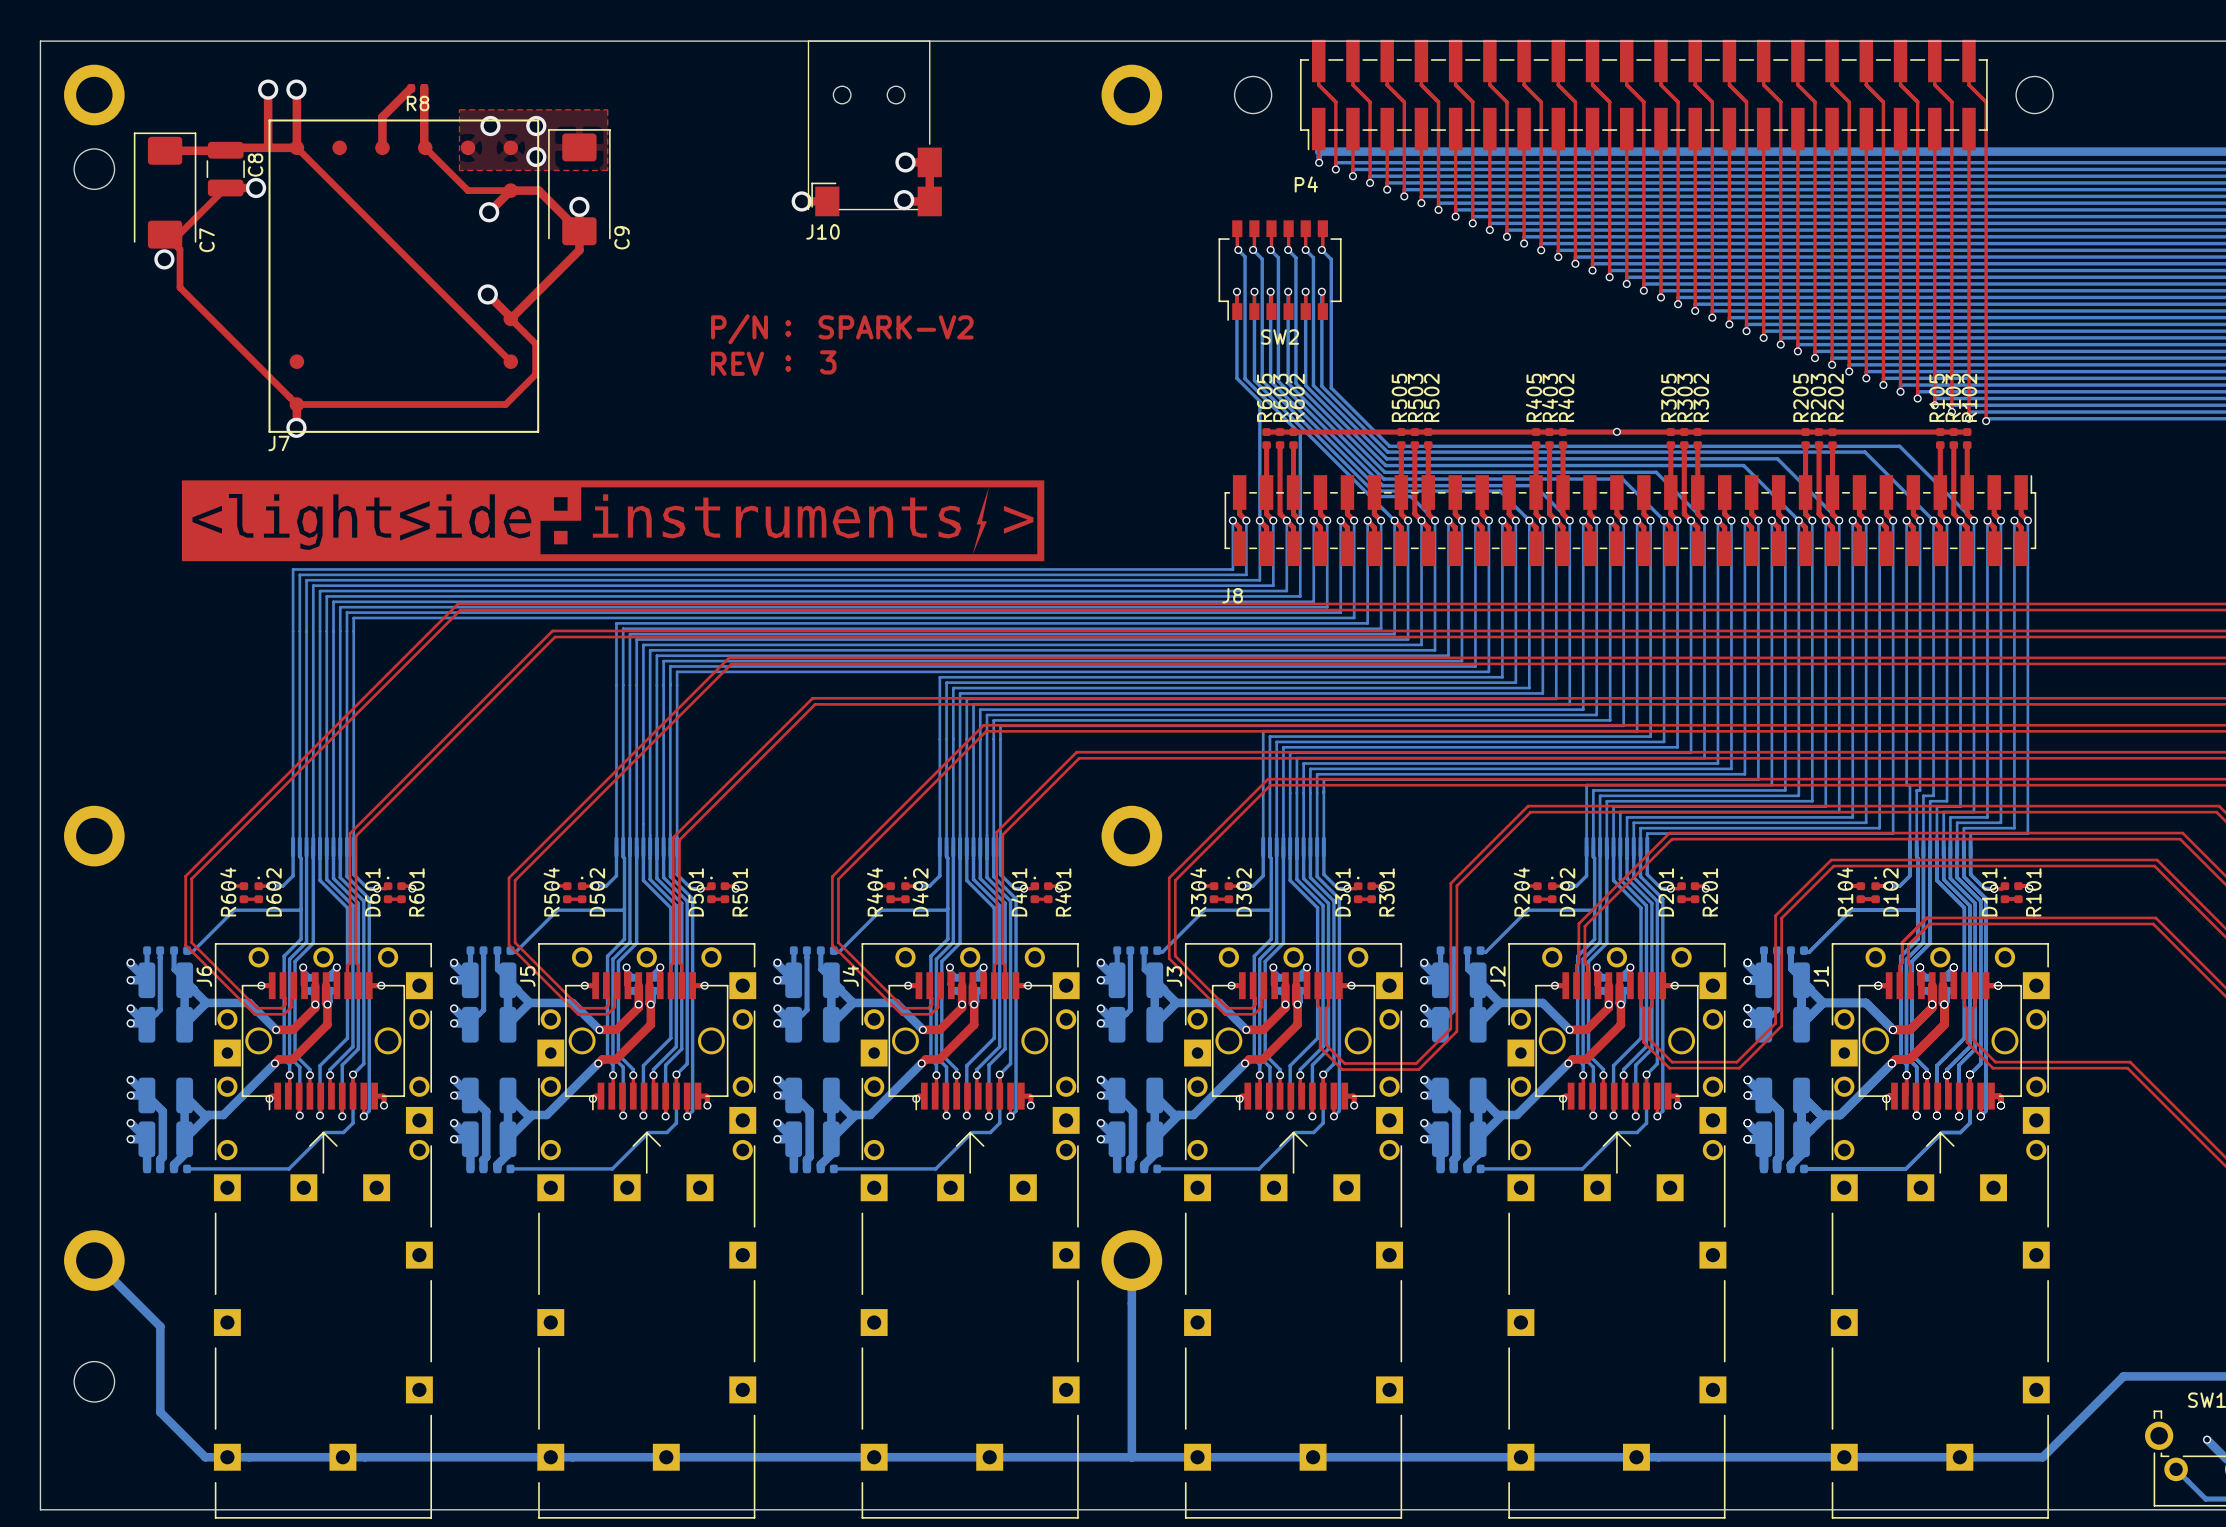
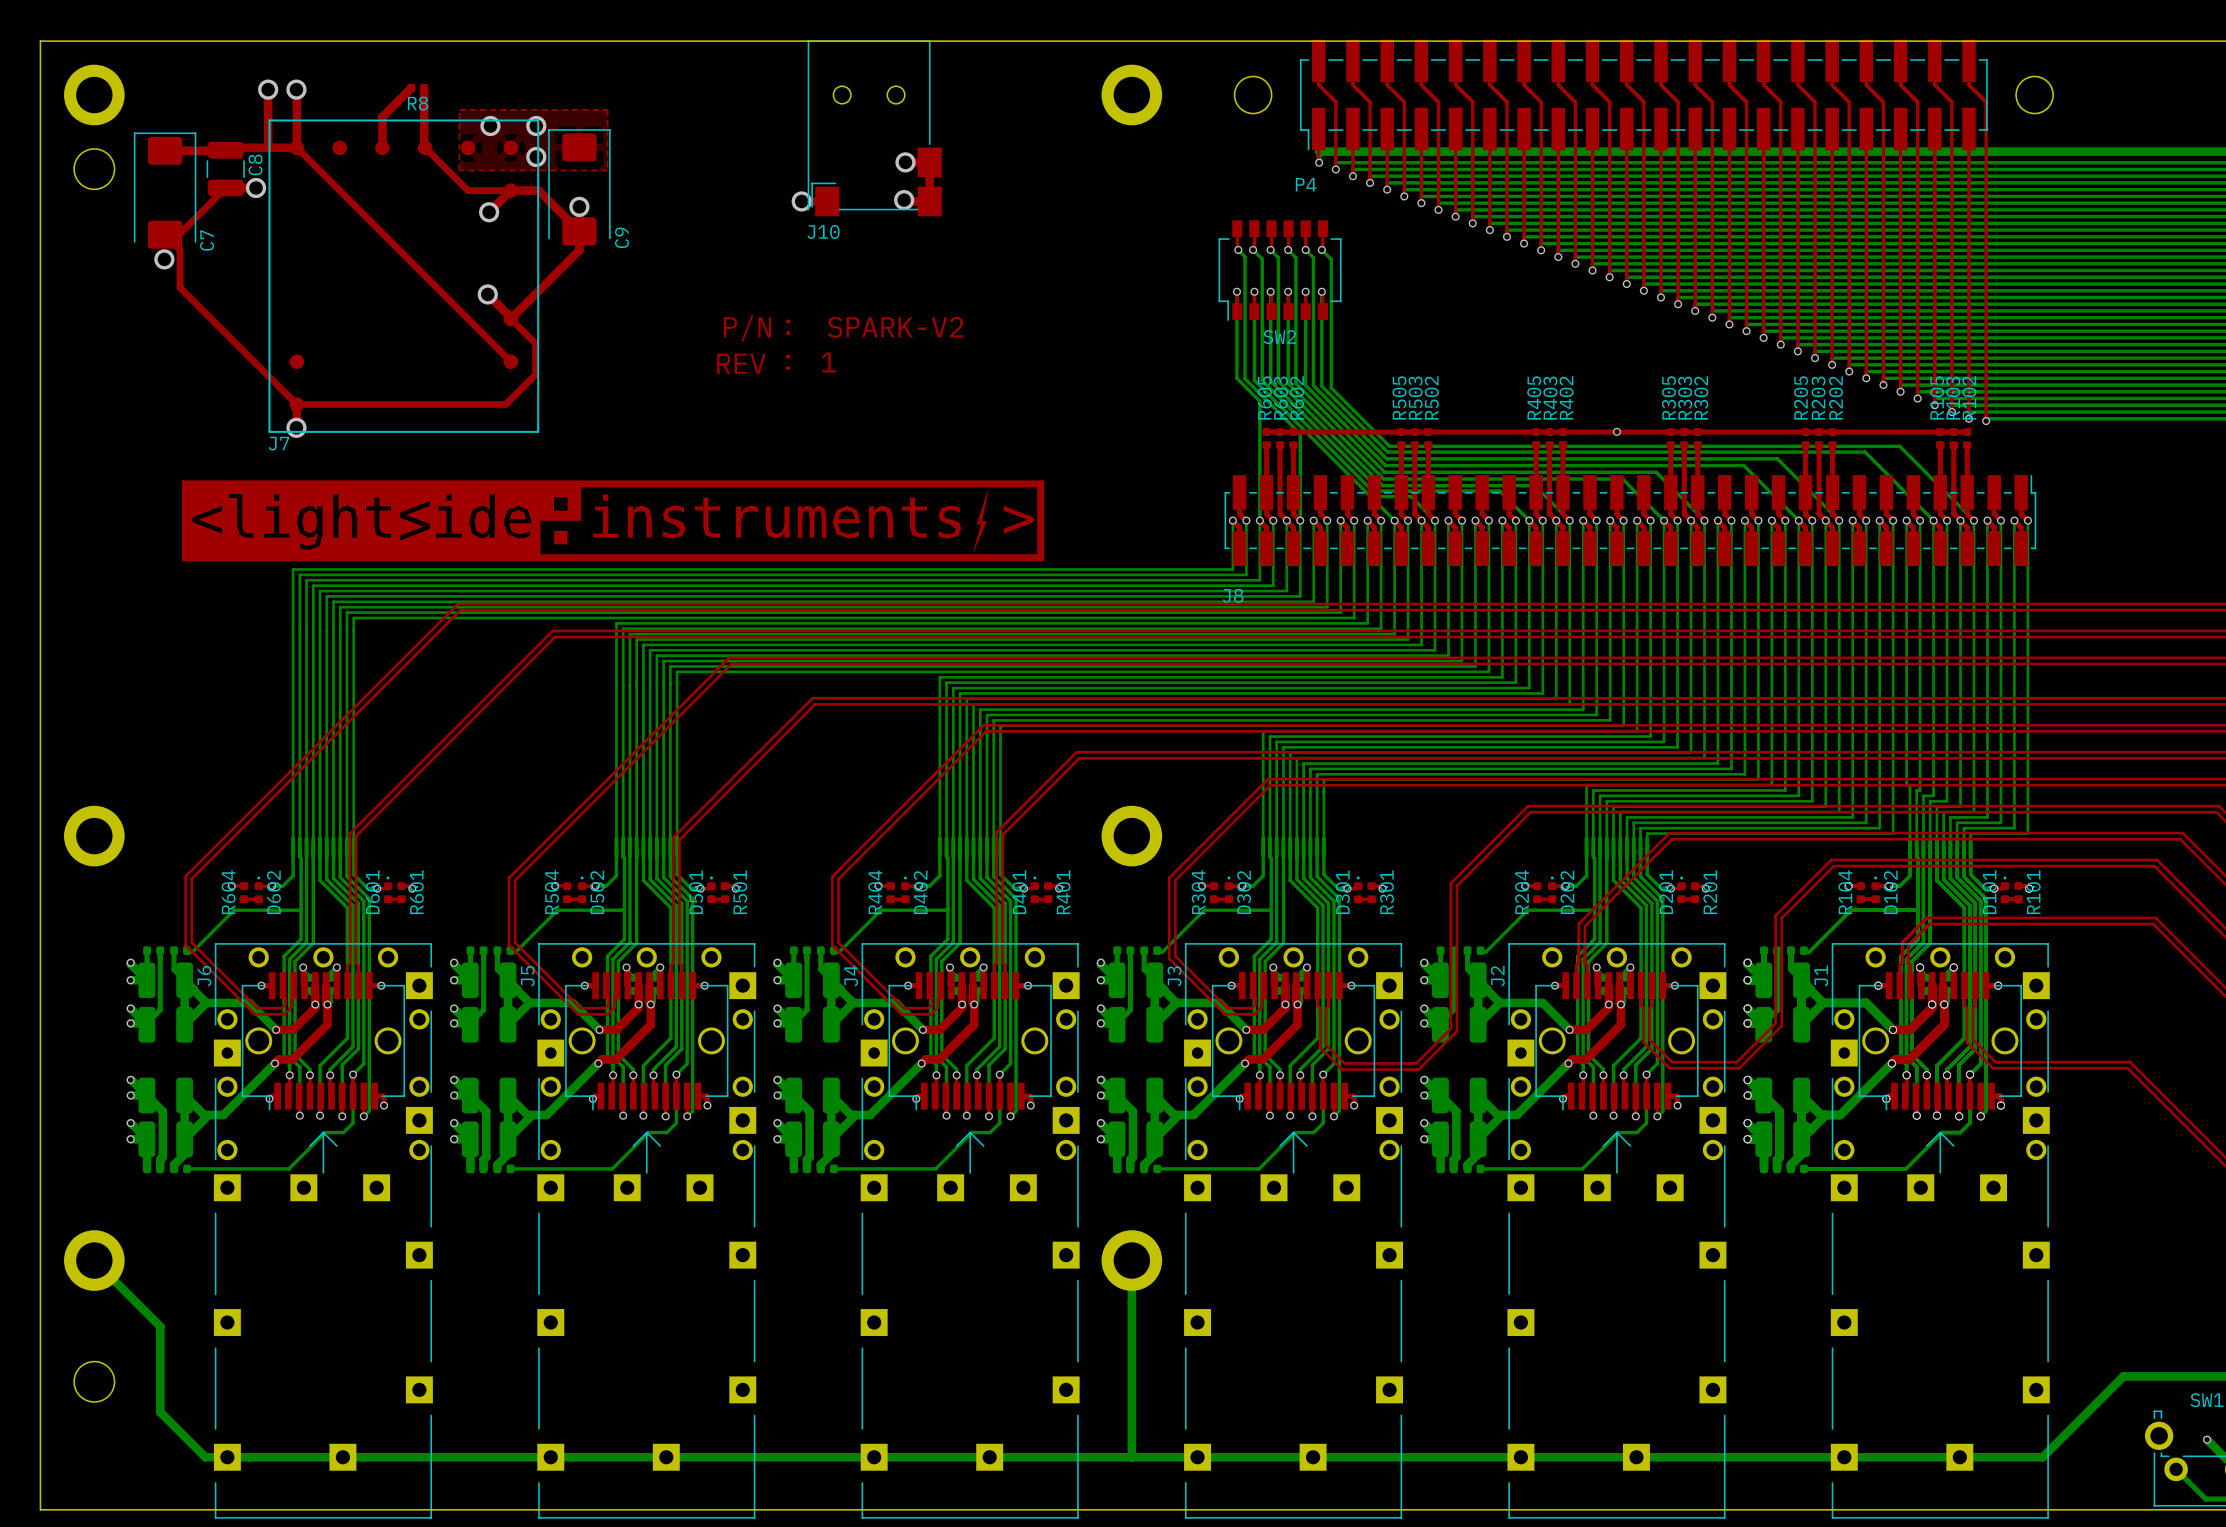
text: 3 (828, 362) -> 1 (828, 362)

